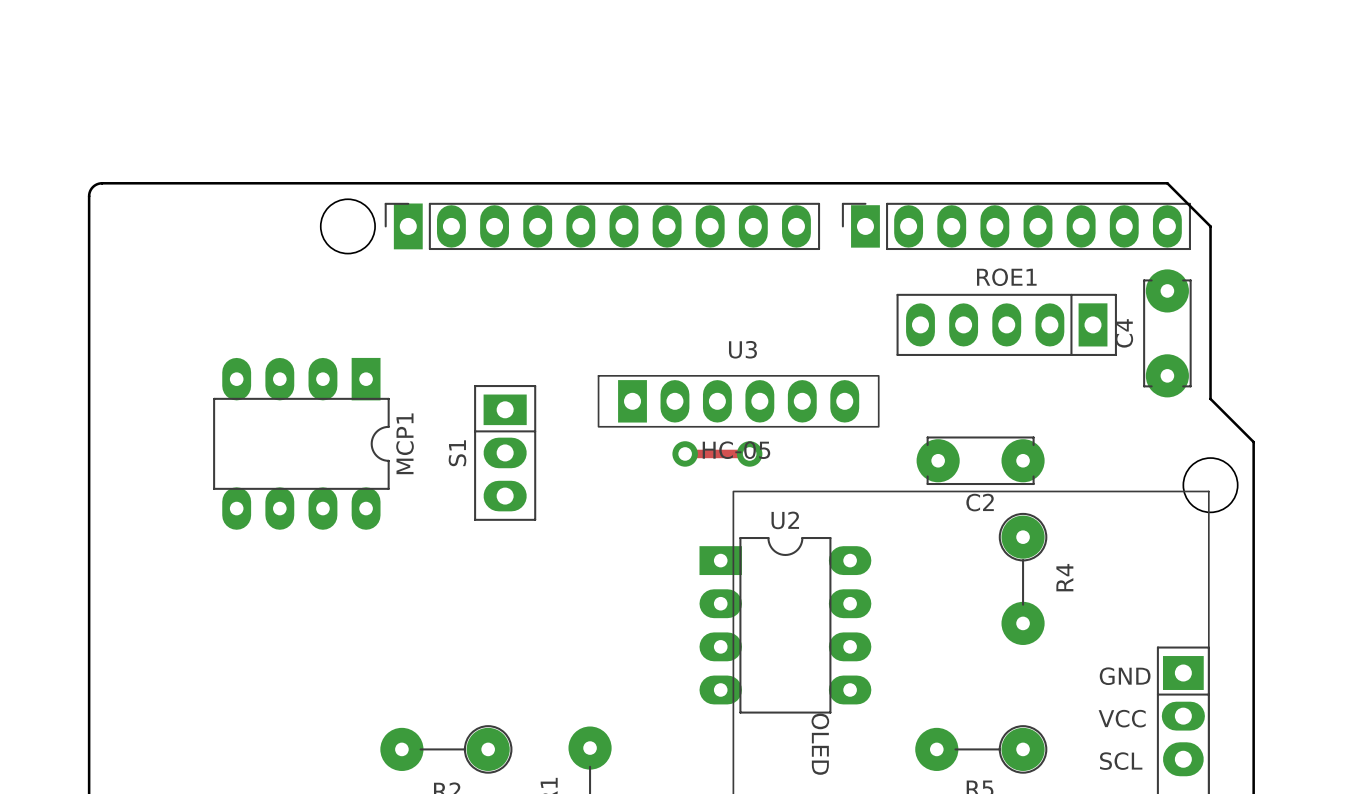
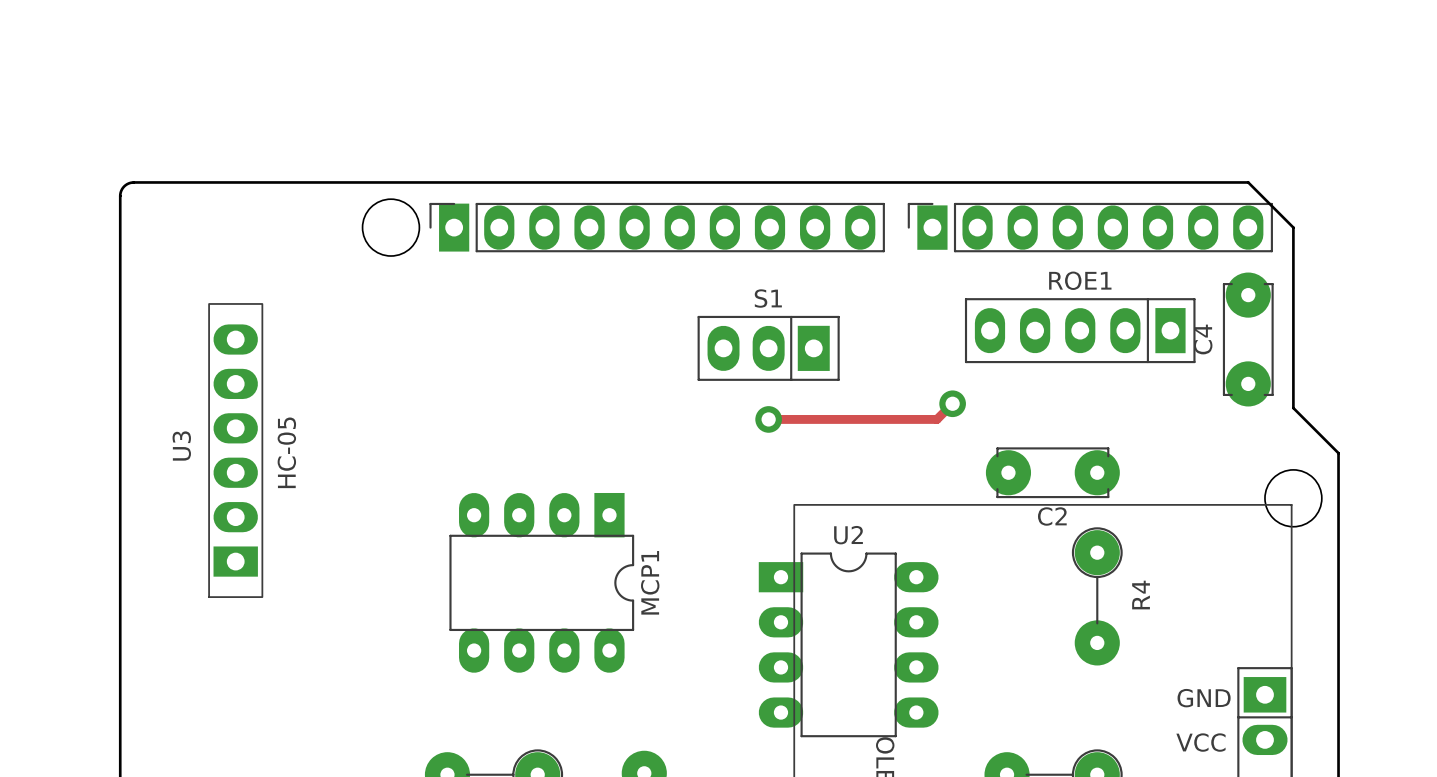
track: none -> (952, 403) (936, 419) (768, 419)
via: none -> (952, 403)
U3 rotation: 0° (738, 401) -> 90° counterclockwise (235, 450)
U3 position: (738, 401) -> (235, 450)
via: none -> (768, 419)
MCP1 position: (301, 443) -> (541, 582)
S1 rotation: 0° (505, 452) -> 90° clockwise (768, 348)
S1 position: (505, 452) -> (768, 348)
track: (685, 453) (749, 453) -> none
via: (685, 453) -> none
via: (749, 453) -> none

